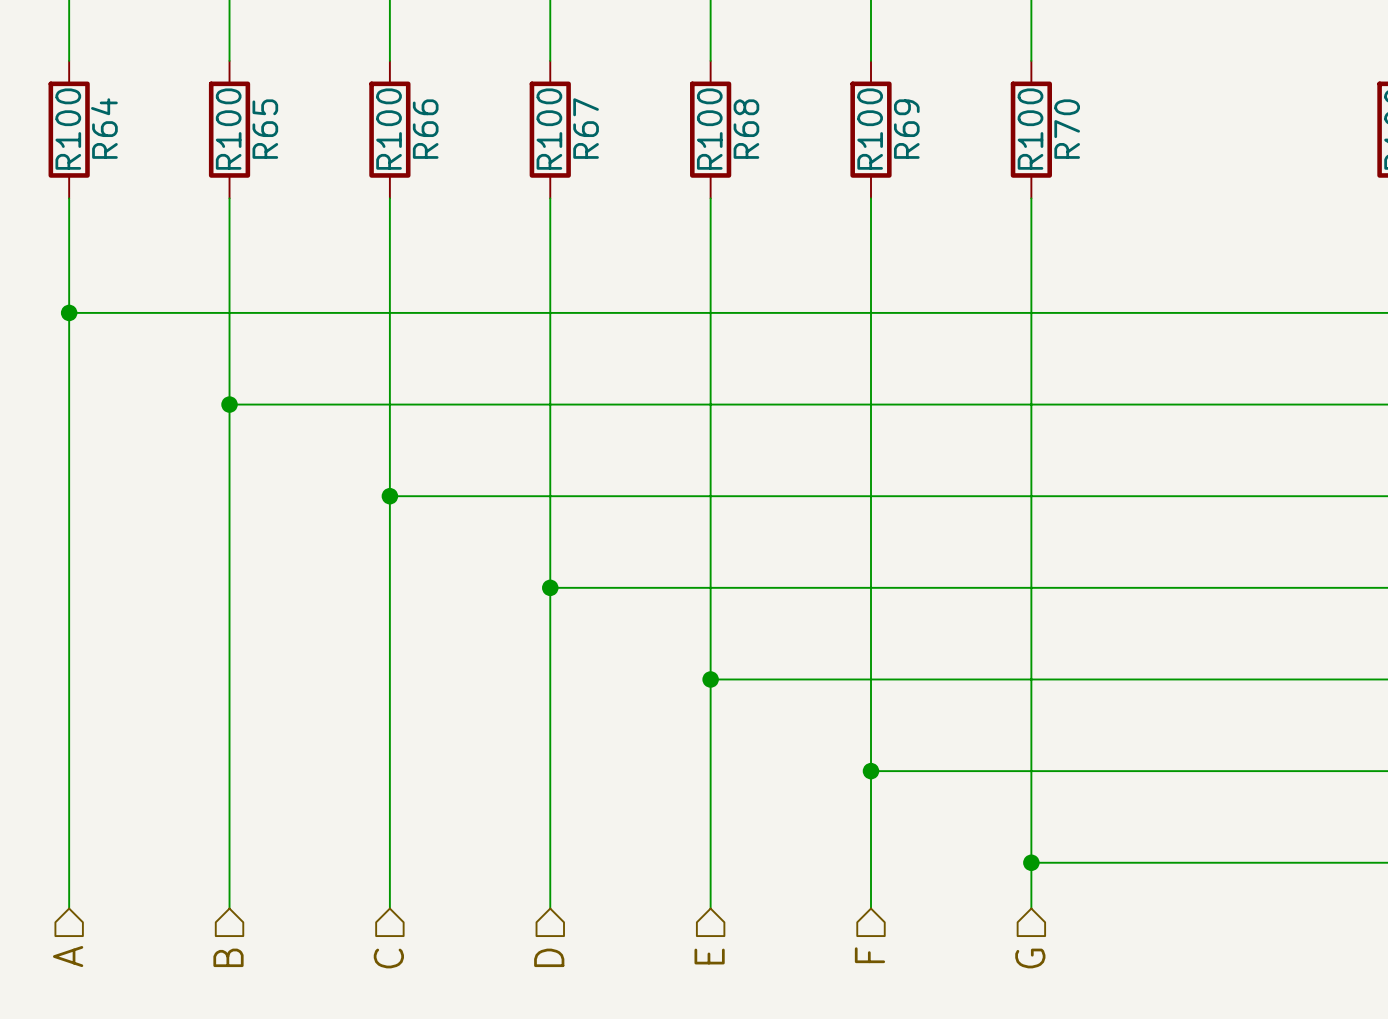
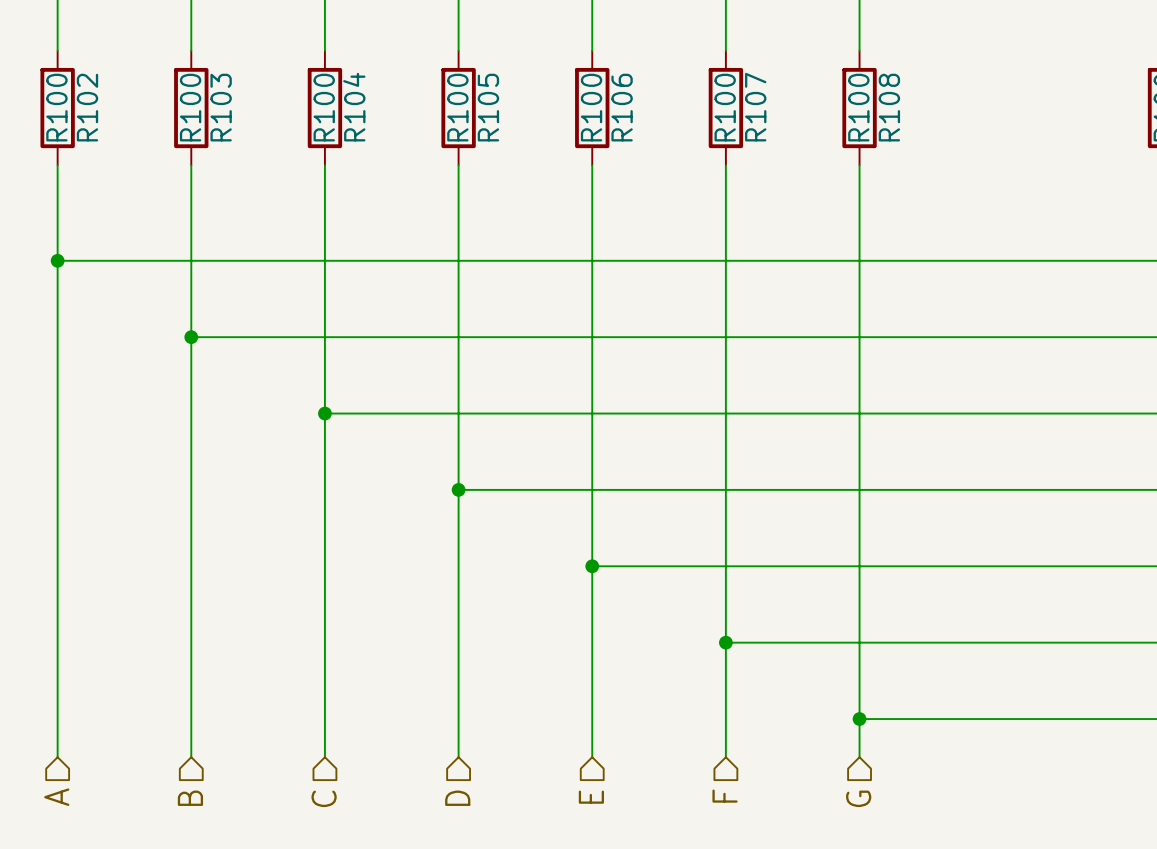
R64 name: R64 (104, 128) -> R102 (87, 107)
R67 name: R67 (586, 128) -> R105 (488, 107)
R65 name: R65 (265, 129) -> R103 (221, 107)
R66 name: R66 (425, 129) -> R104 (354, 107)
R68 name: R68 (746, 129) -> R106 (622, 107)
R69 name: R69 (906, 129) -> R107 (755, 107)
R70 name: R70 (1067, 129) -> R108 (889, 107)

